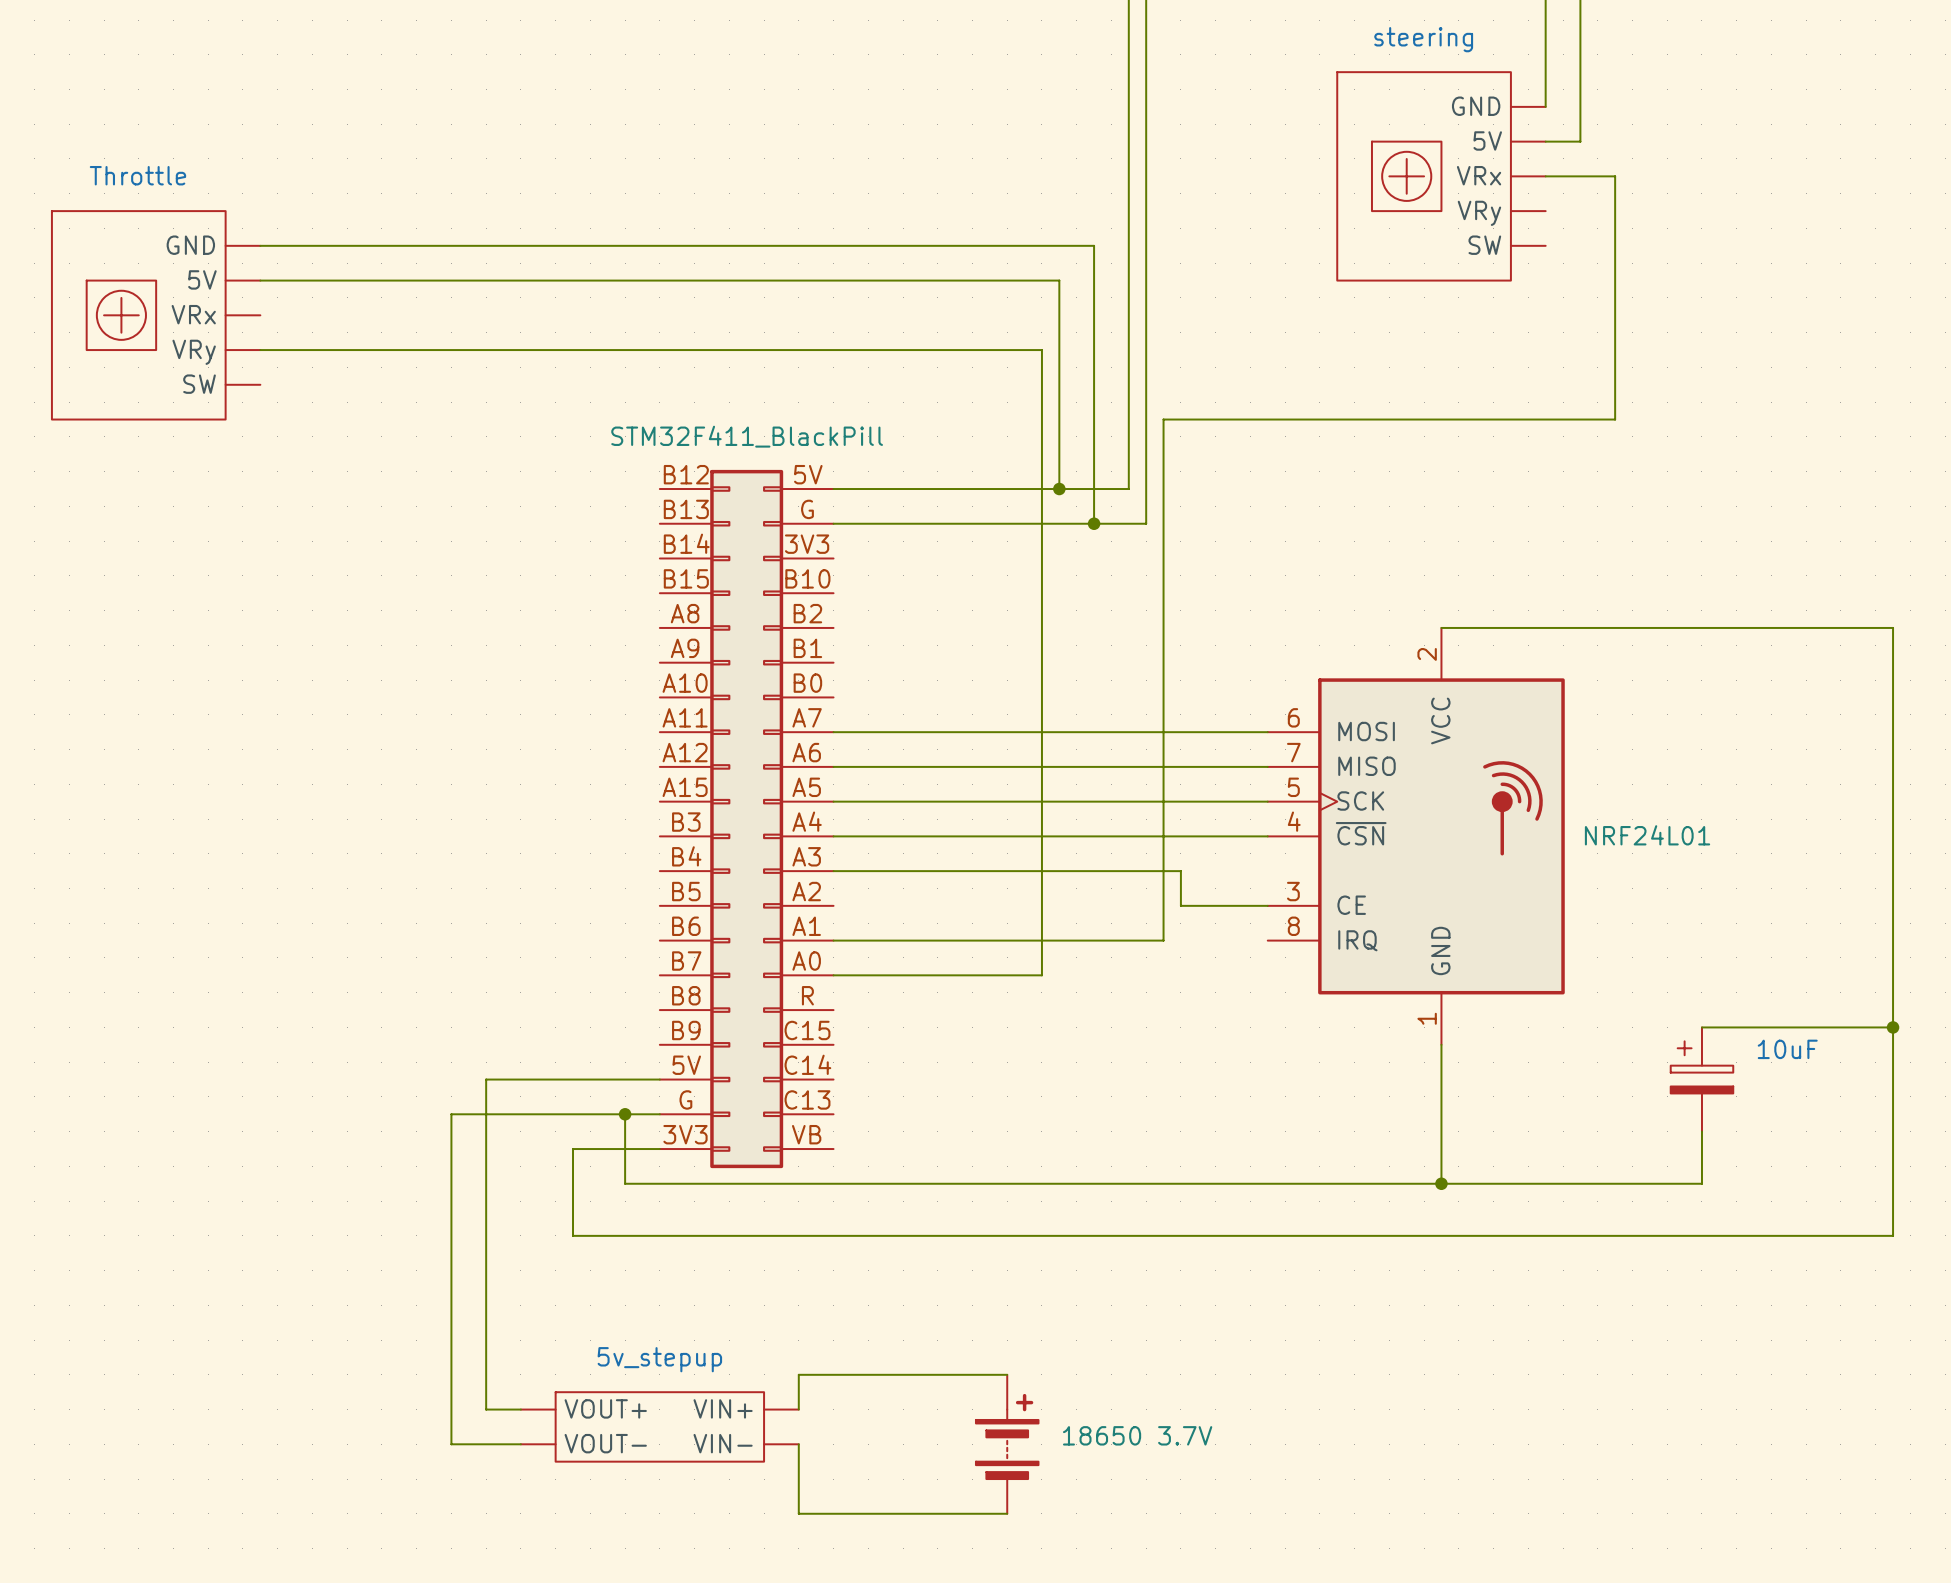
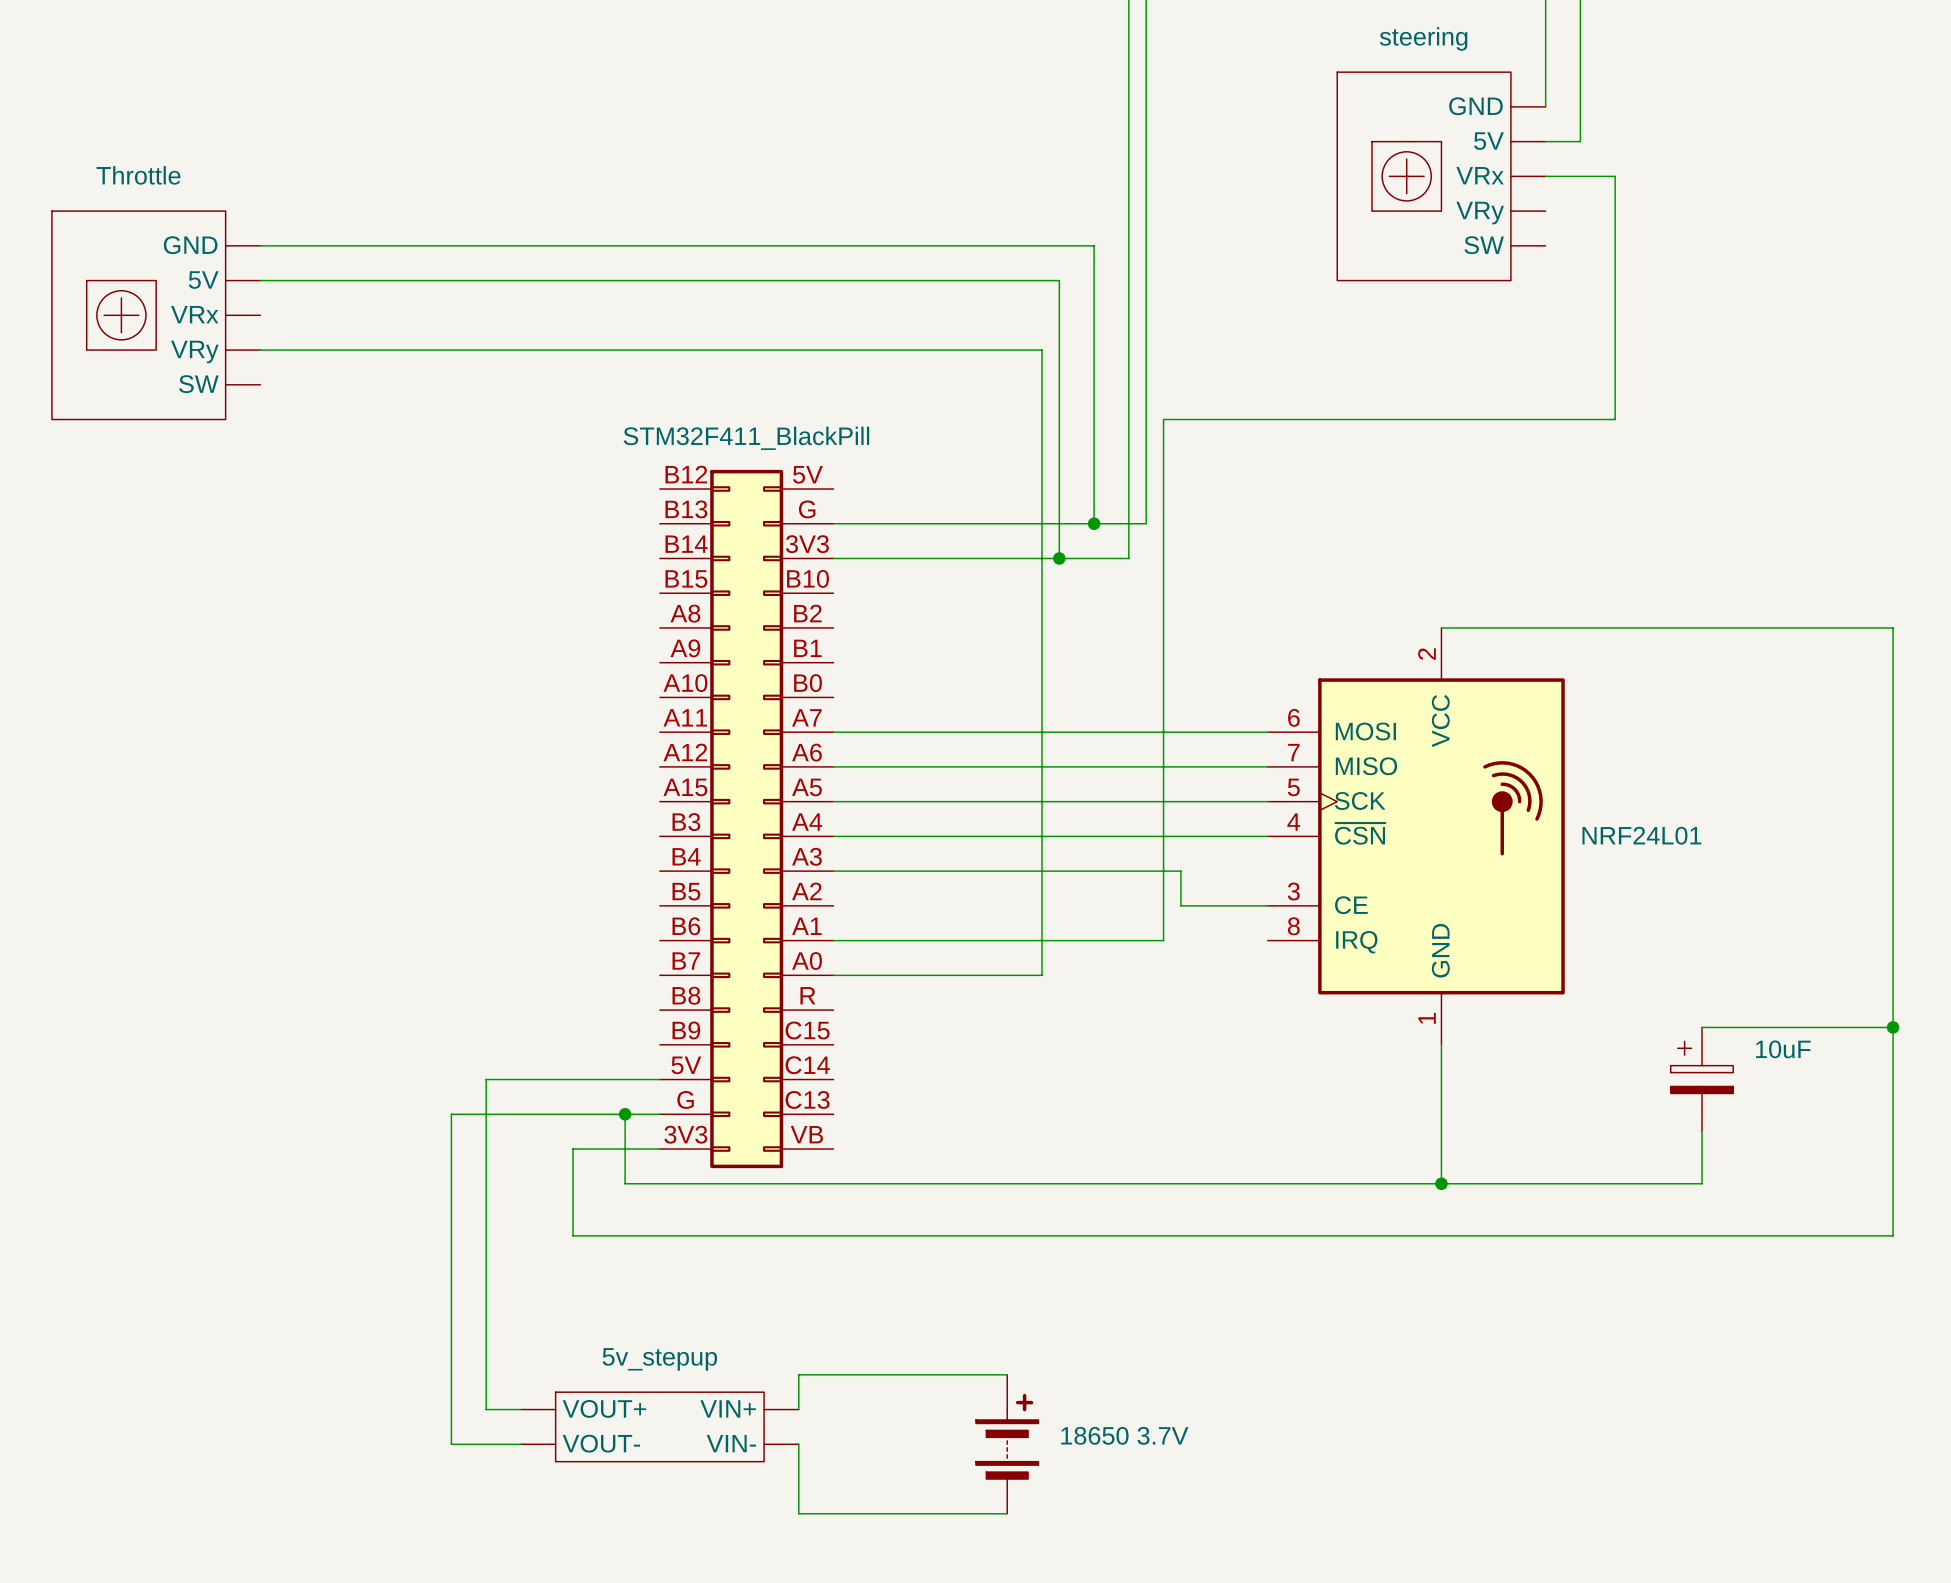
wire: (833, 489) (1128, 489) -> (833, 558) (1128, 558) (1128, 489)
wire: none -> (1059, 489) (1059, 558)
junction position: (1059, 489) -> (1059, 558)

